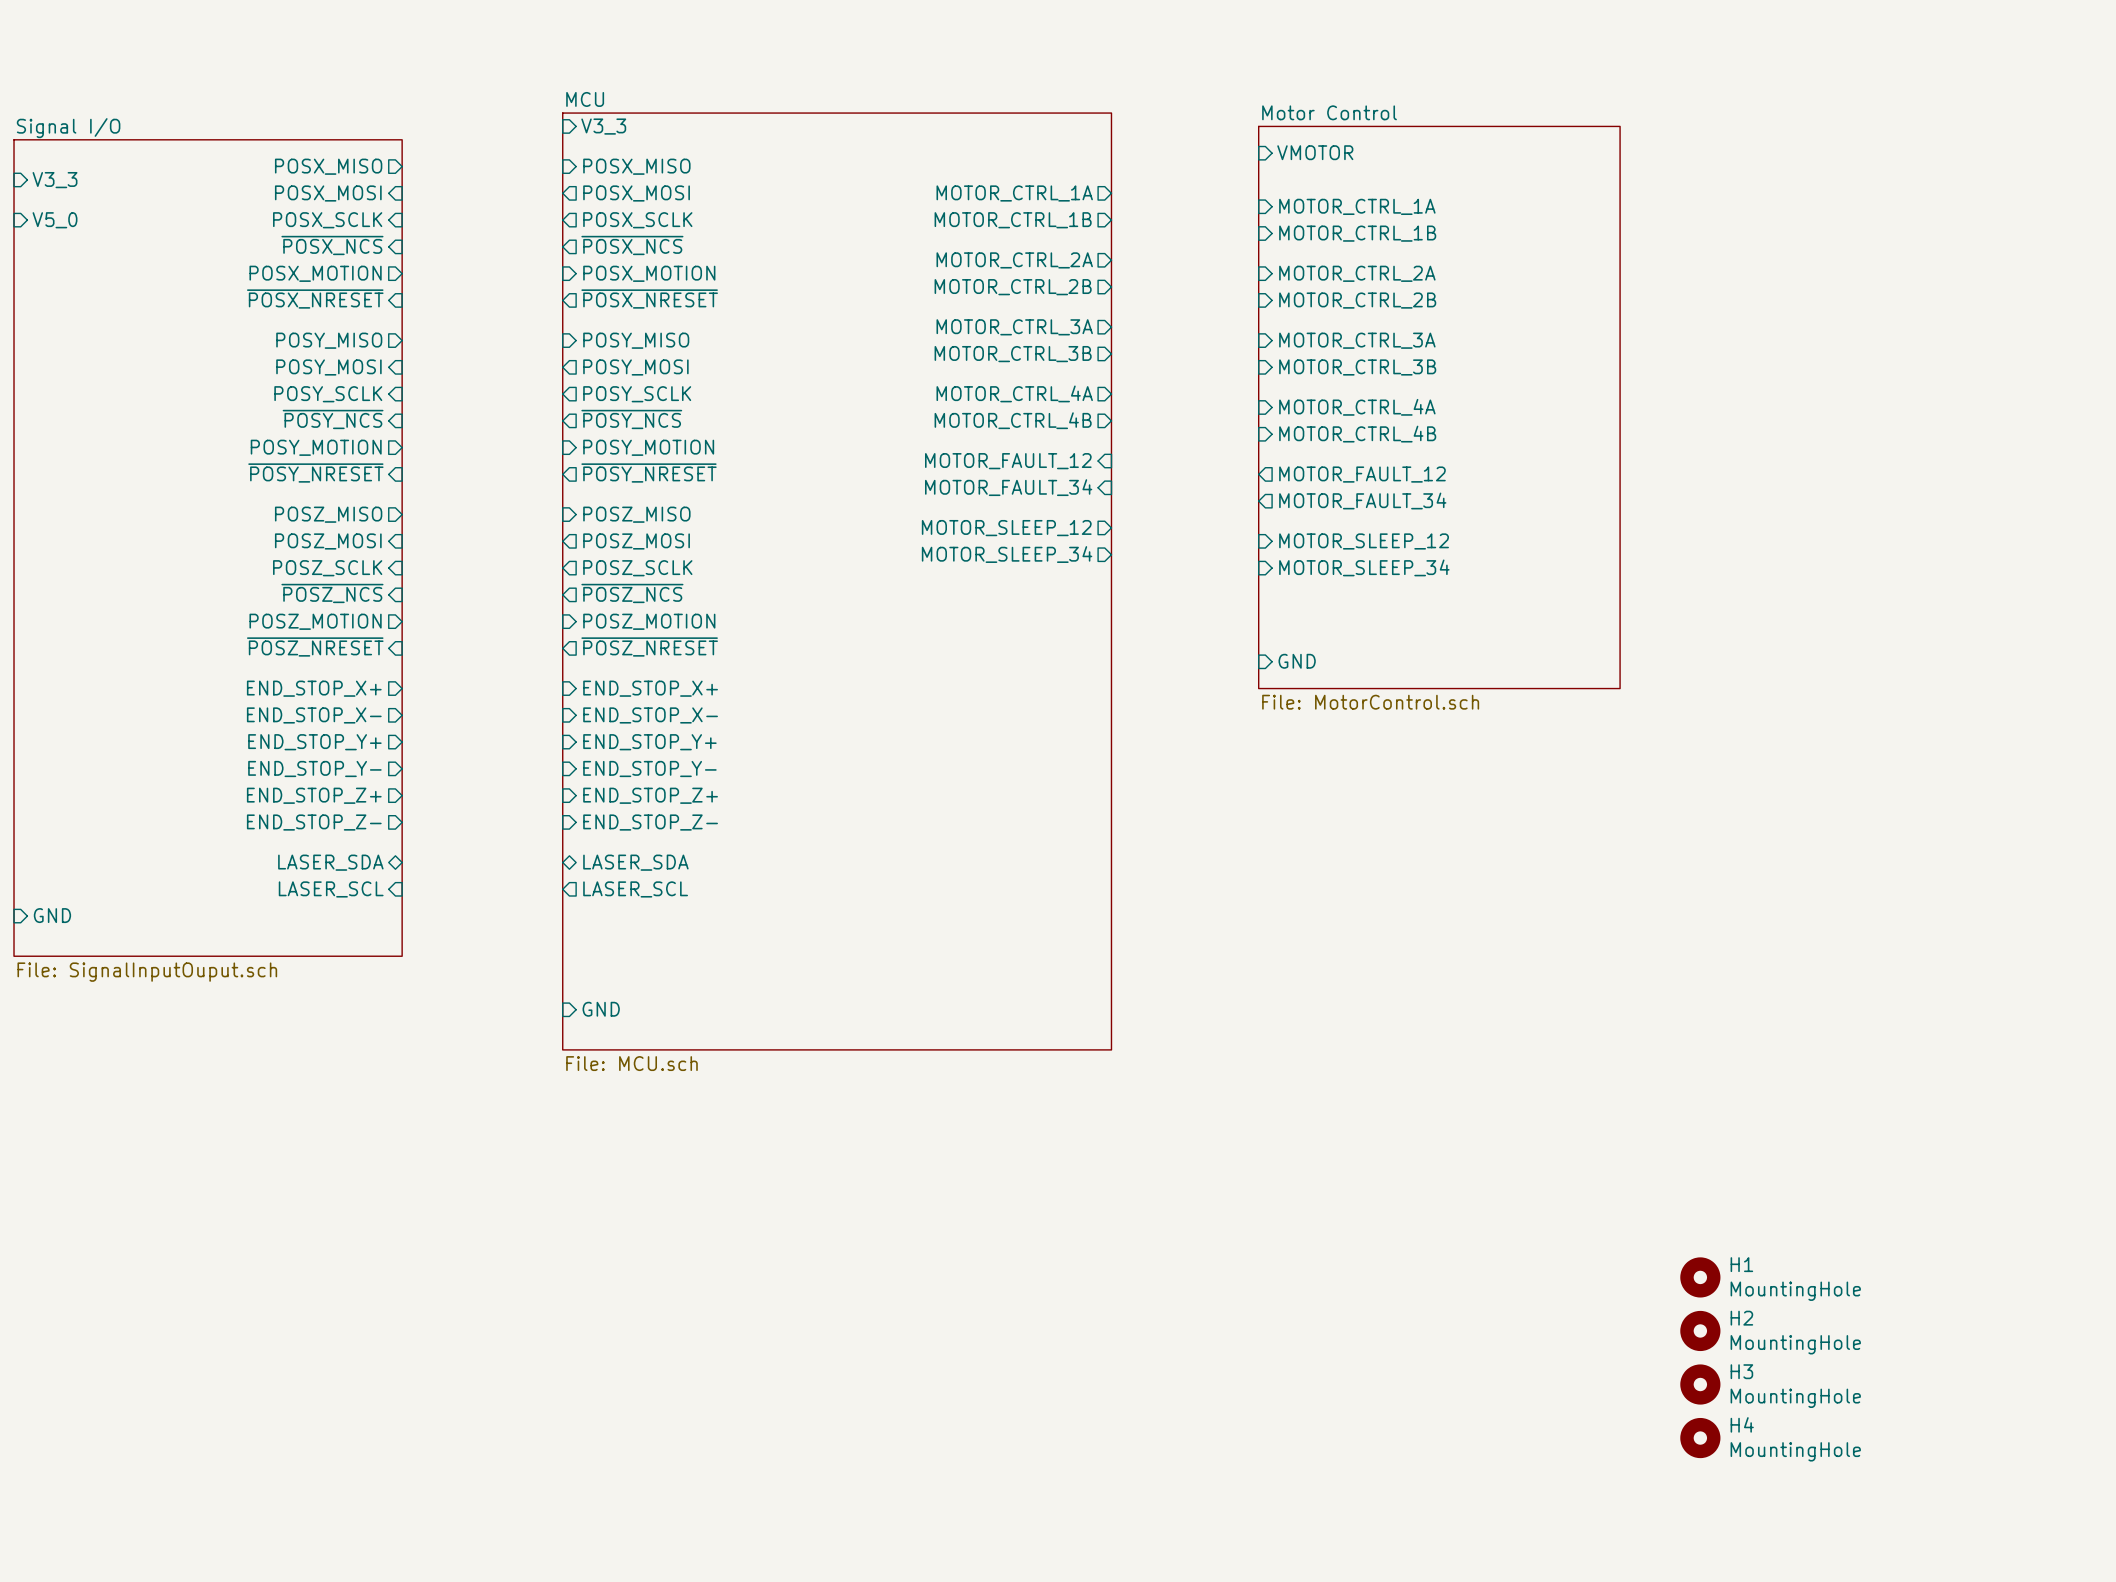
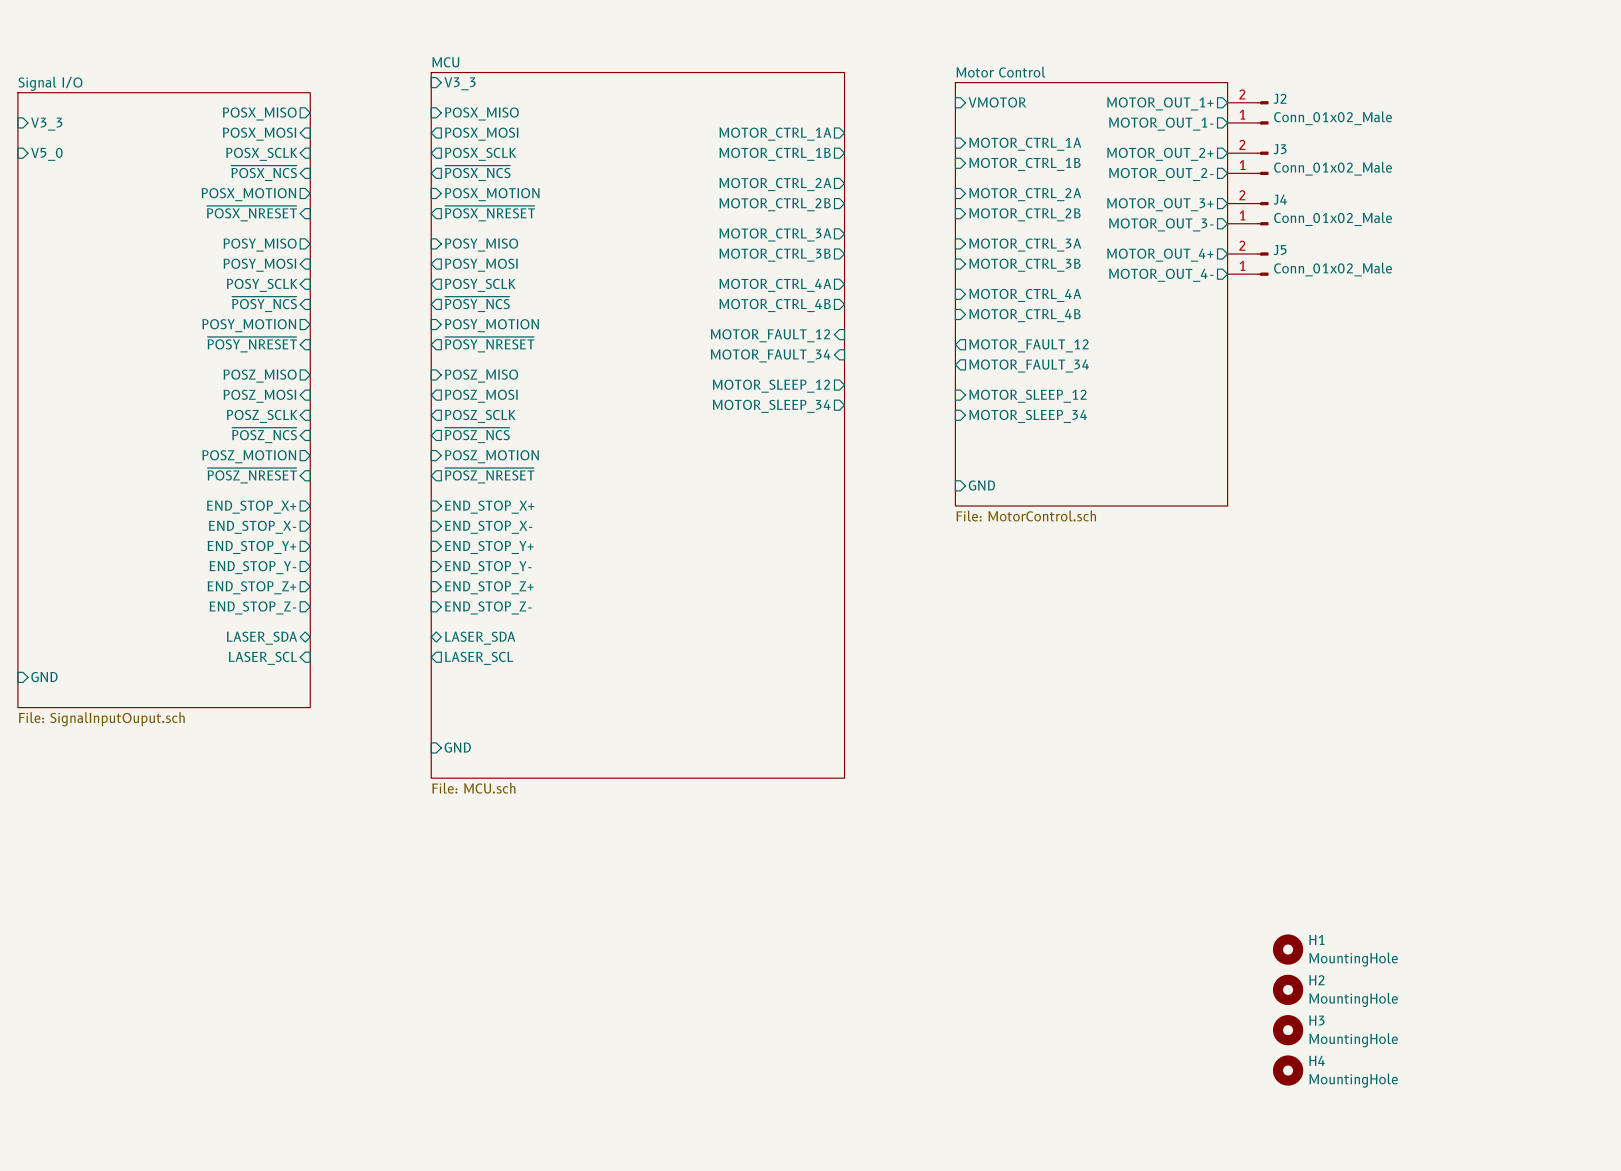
sheet pin: none -> MOTOR_OUT_1+ (1160, 103)
J2: none -> Conn_01x02_Male (1248, 112)
sheet pin: none -> MOTOR_OUT_1- (1161, 124)
sheet pin: none -> MOTOR_OUT_2+ (1160, 154)
J3: none -> Conn_01x02_Male (1248, 163)
sheet pin: none -> MOTOR_OUT_2- (1161, 174)
sheet pin: none -> MOTOR_OUT_3+ (1160, 204)
J4: none -> Conn_01x02_Male (1248, 213)
sheet pin: none -> MOTOR_OUT_3- (1161, 224)
sheet pin: none -> MOTOR_OUT_4+ (1160, 255)
J5: none -> Conn_01x02_Male (1248, 264)
sheet pin: none -> MOTOR_OUT_4- (1161, 275)

